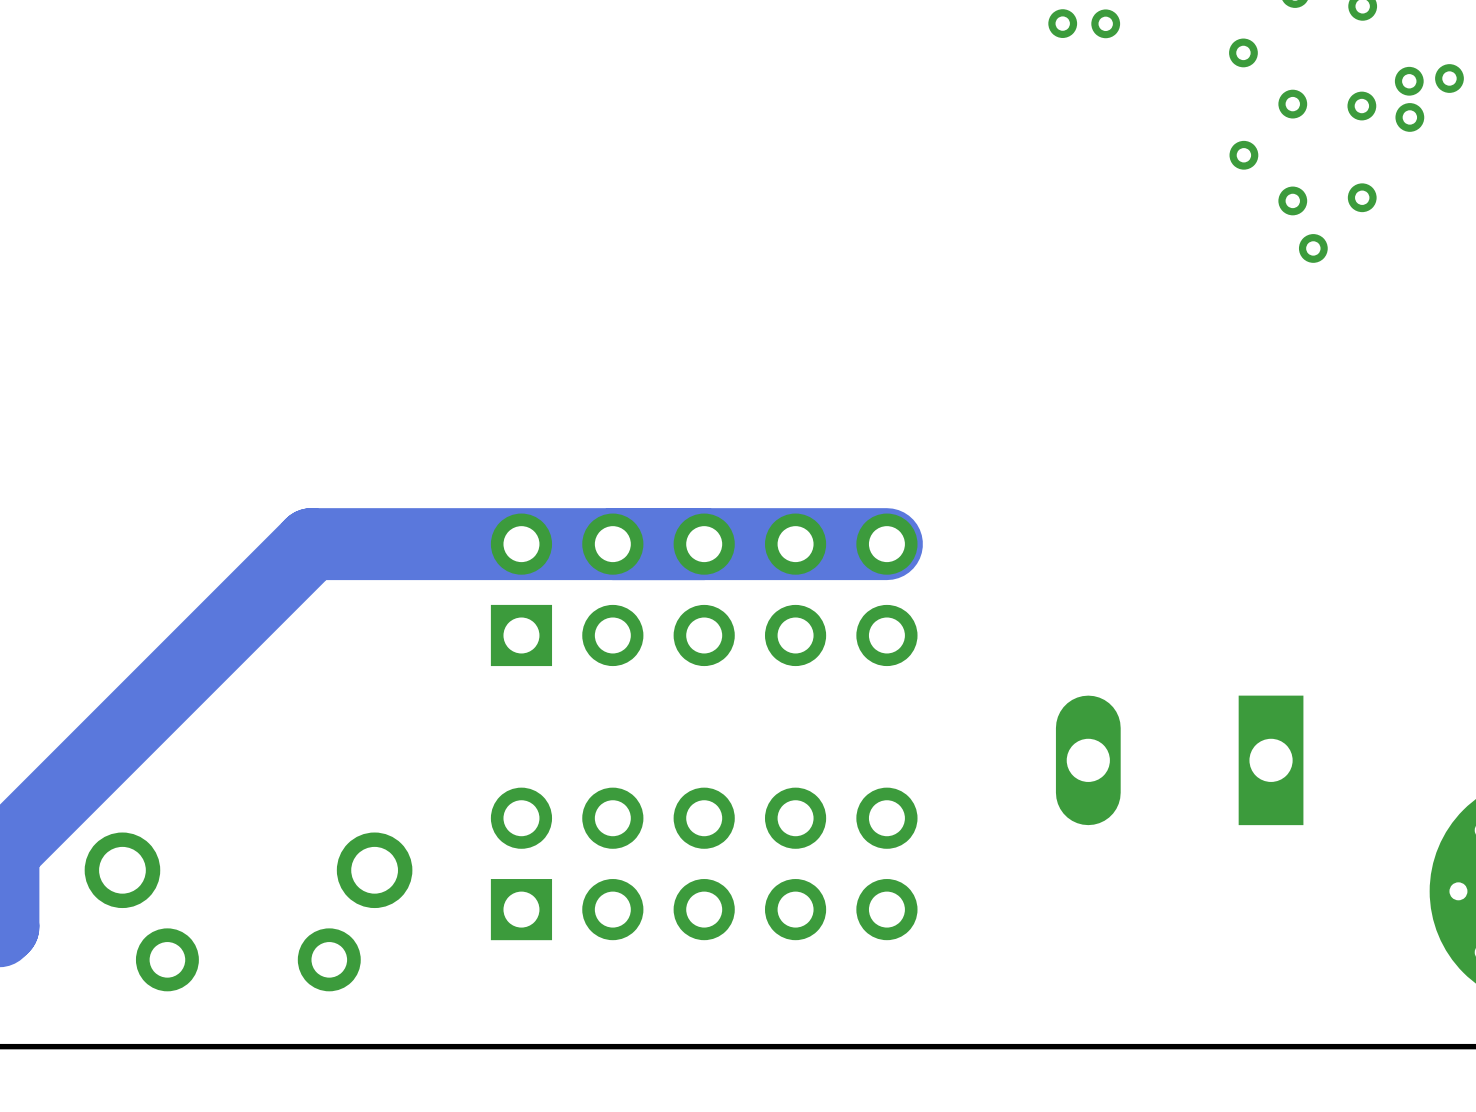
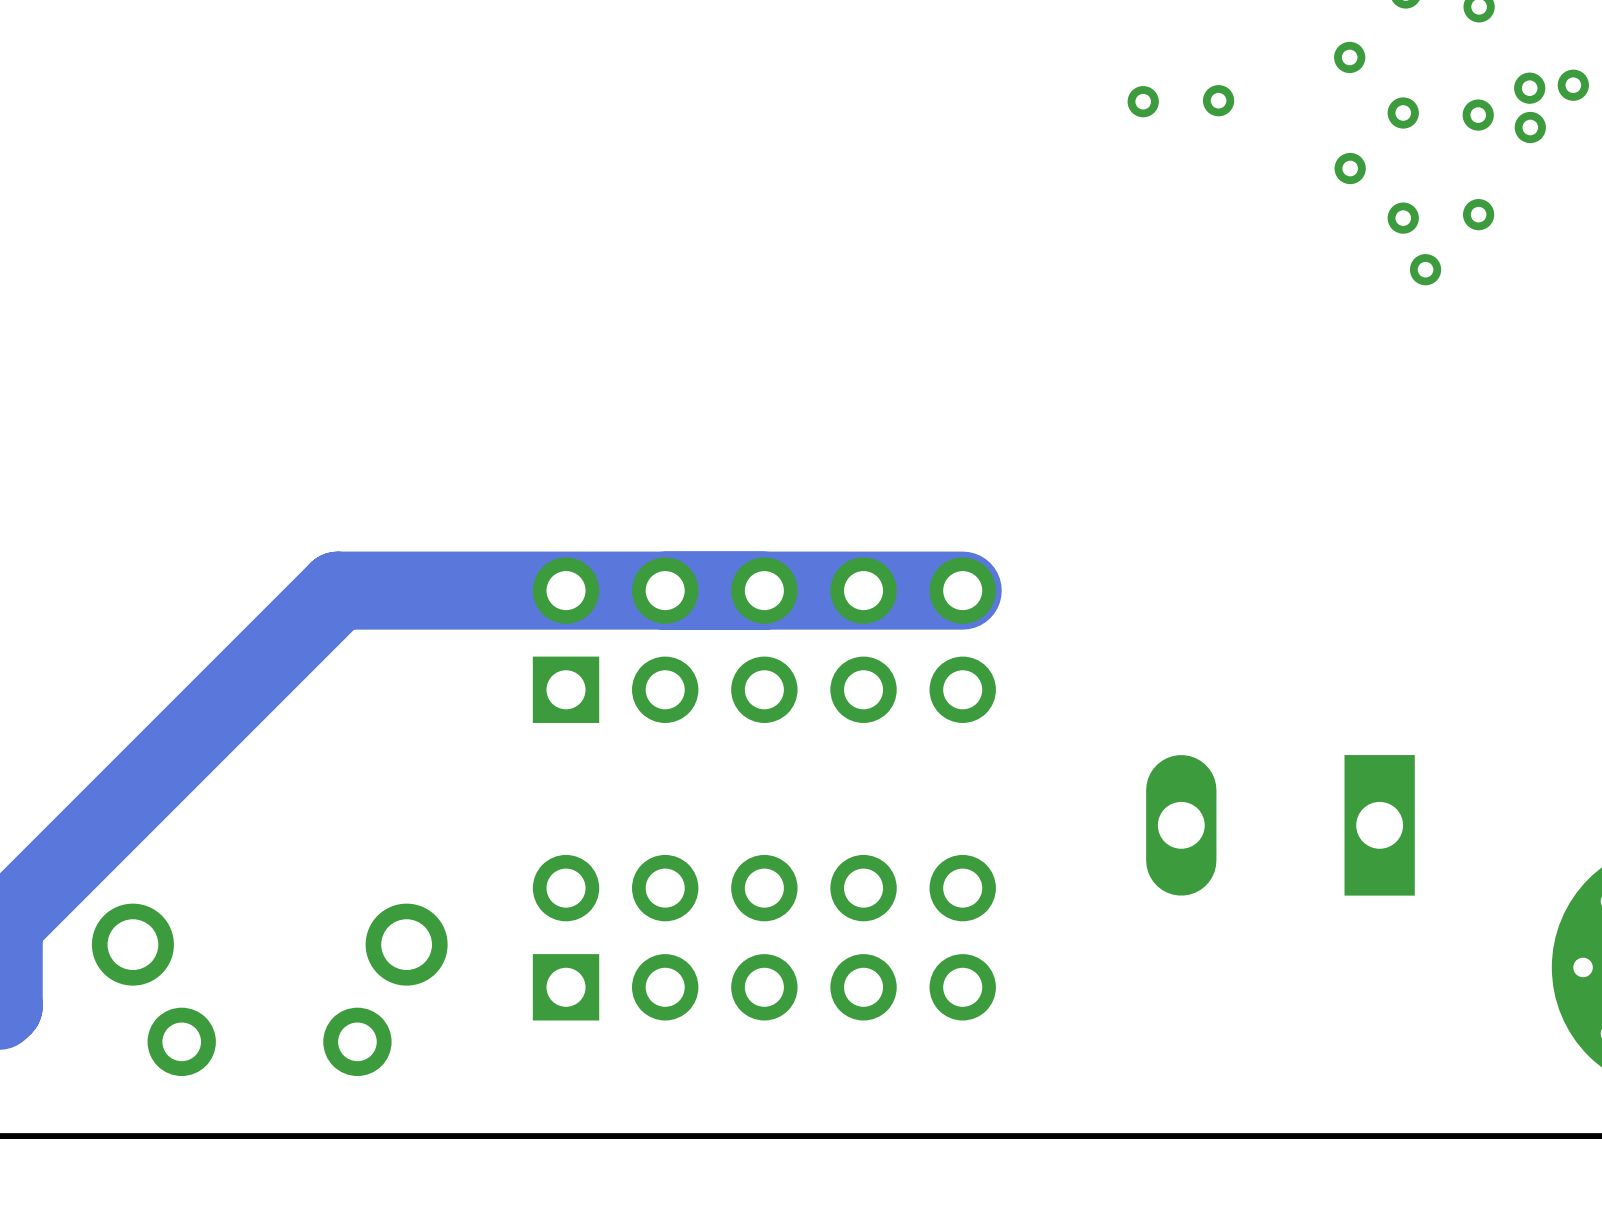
via: (1062, 23) -> none
via: (1105, 23) -> none
via: none -> (1218, 100)
via: none -> (1143, 101)

